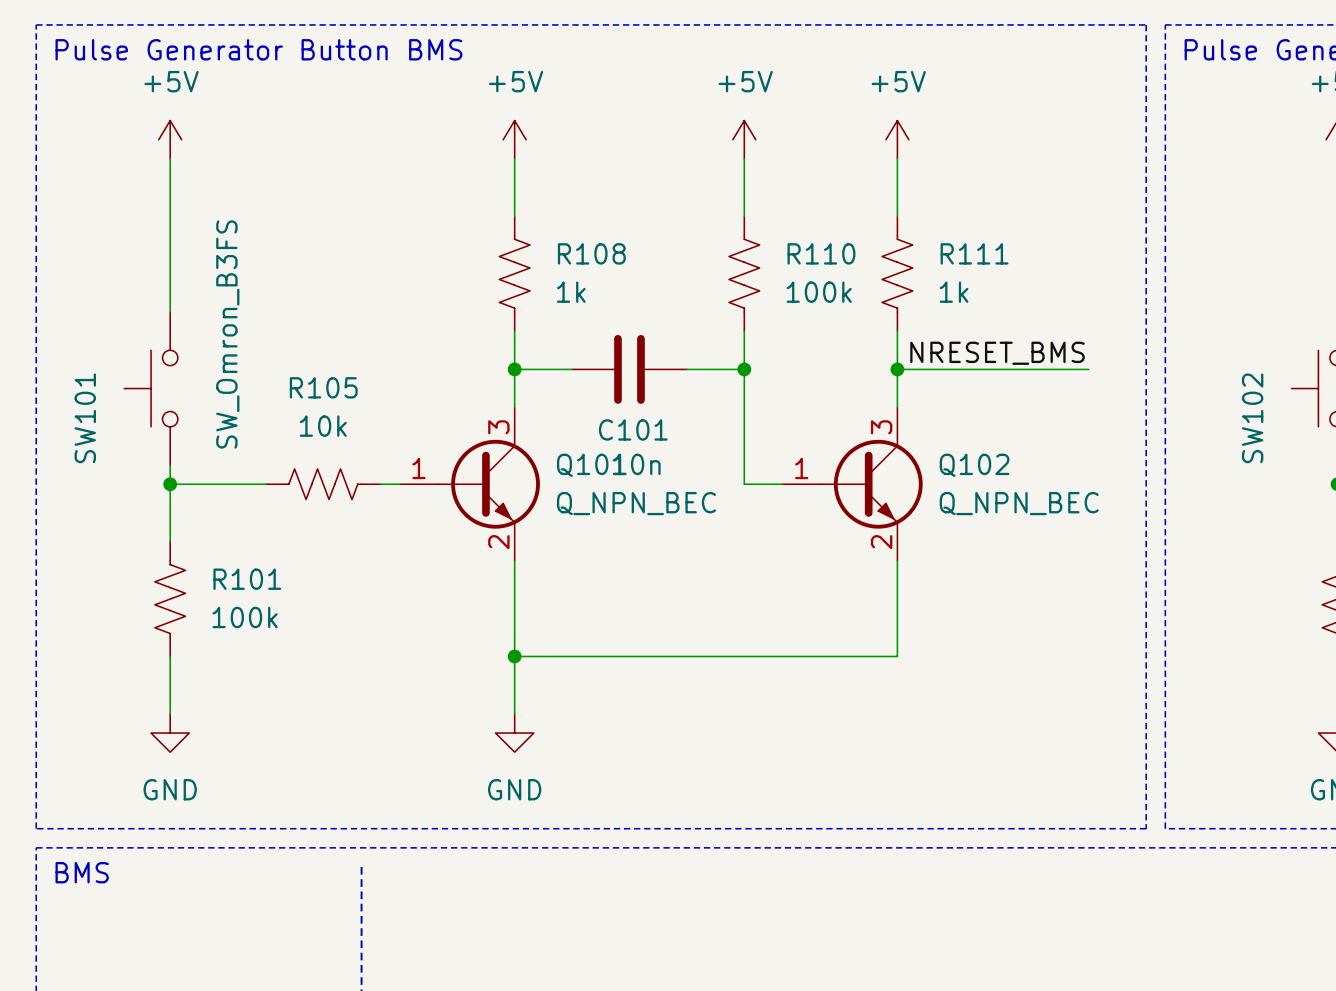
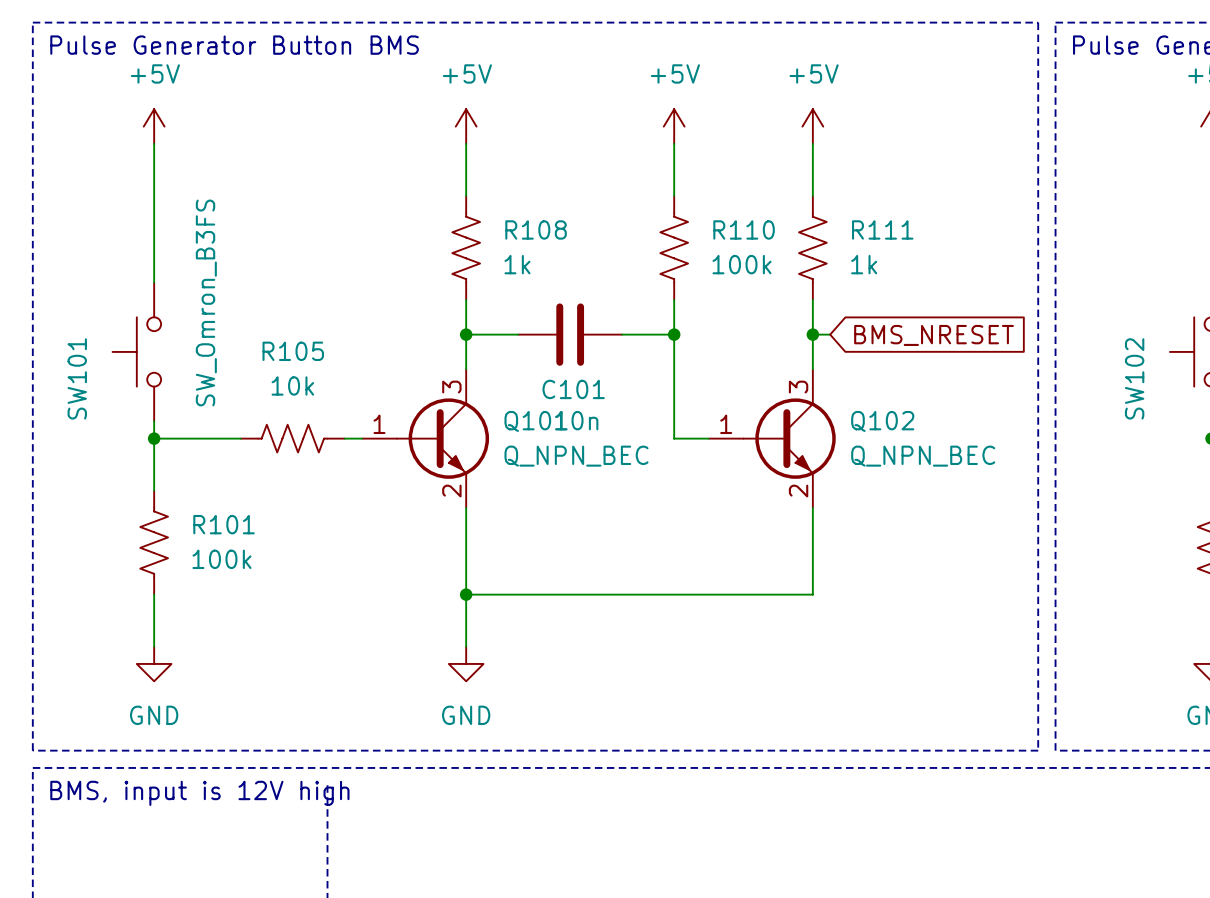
label: NRESET_BMS (997, 353) -> none
wire: (916, 369) (1088, 369) -> none
global label: none -> BMS_NRESET (934, 335)
text: BMS (82, 872) -> BMS, input is 12V high (199, 793)

